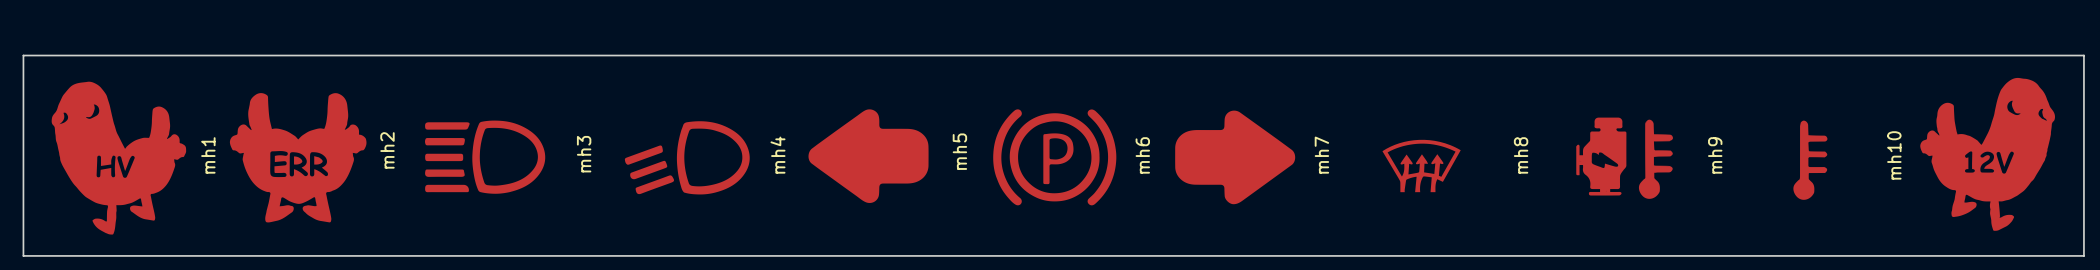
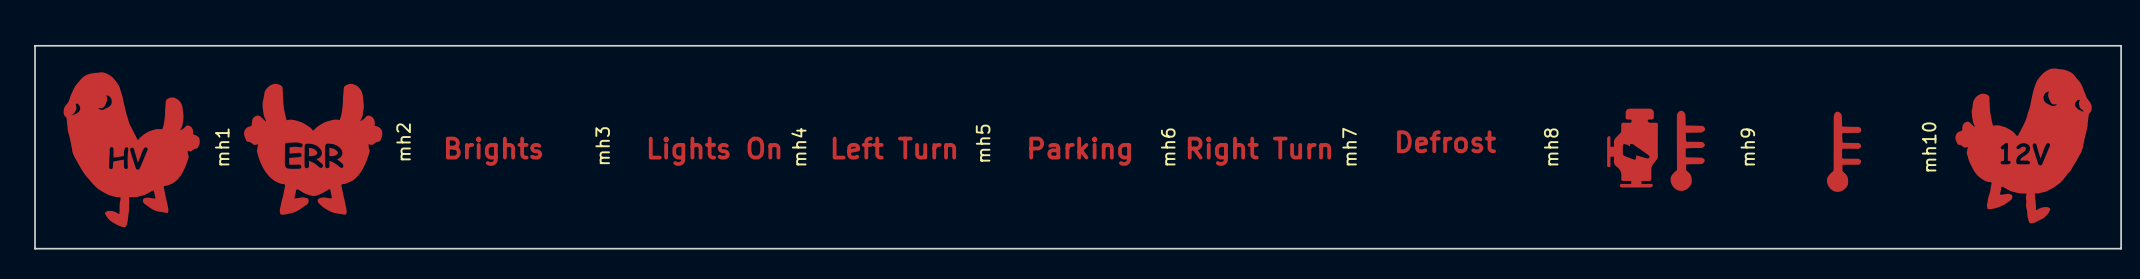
drawing: [808, 109, 929, 203] -> none
drawing: [993, 109, 1117, 206] -> none
drawing: [1175, 110, 1296, 205] -> none
drawing: [425, 120, 546, 194] -> none
drawing: [624, 121, 750, 195] -> none
drawing: [1382, 139, 1461, 193] -> none
text: none -> Defrost (1446, 141)
text: none -> Left Turn (894, 148)
text: none -> Brights (494, 151)
text: none -> Lights On (714, 151)
text: none -> Parking (1080, 151)
text: none -> Right Turn (1259, 151)

